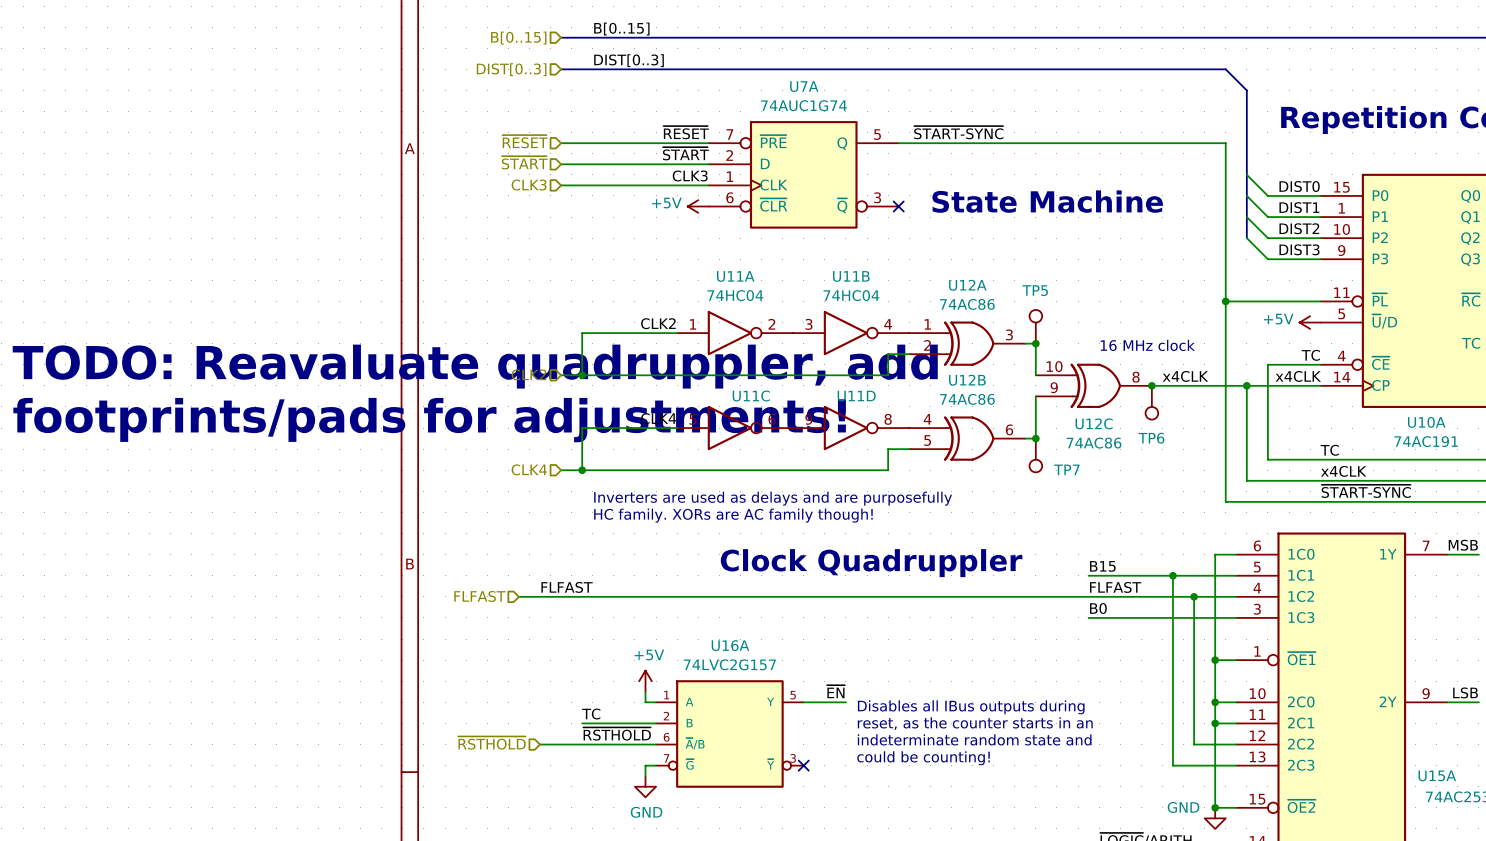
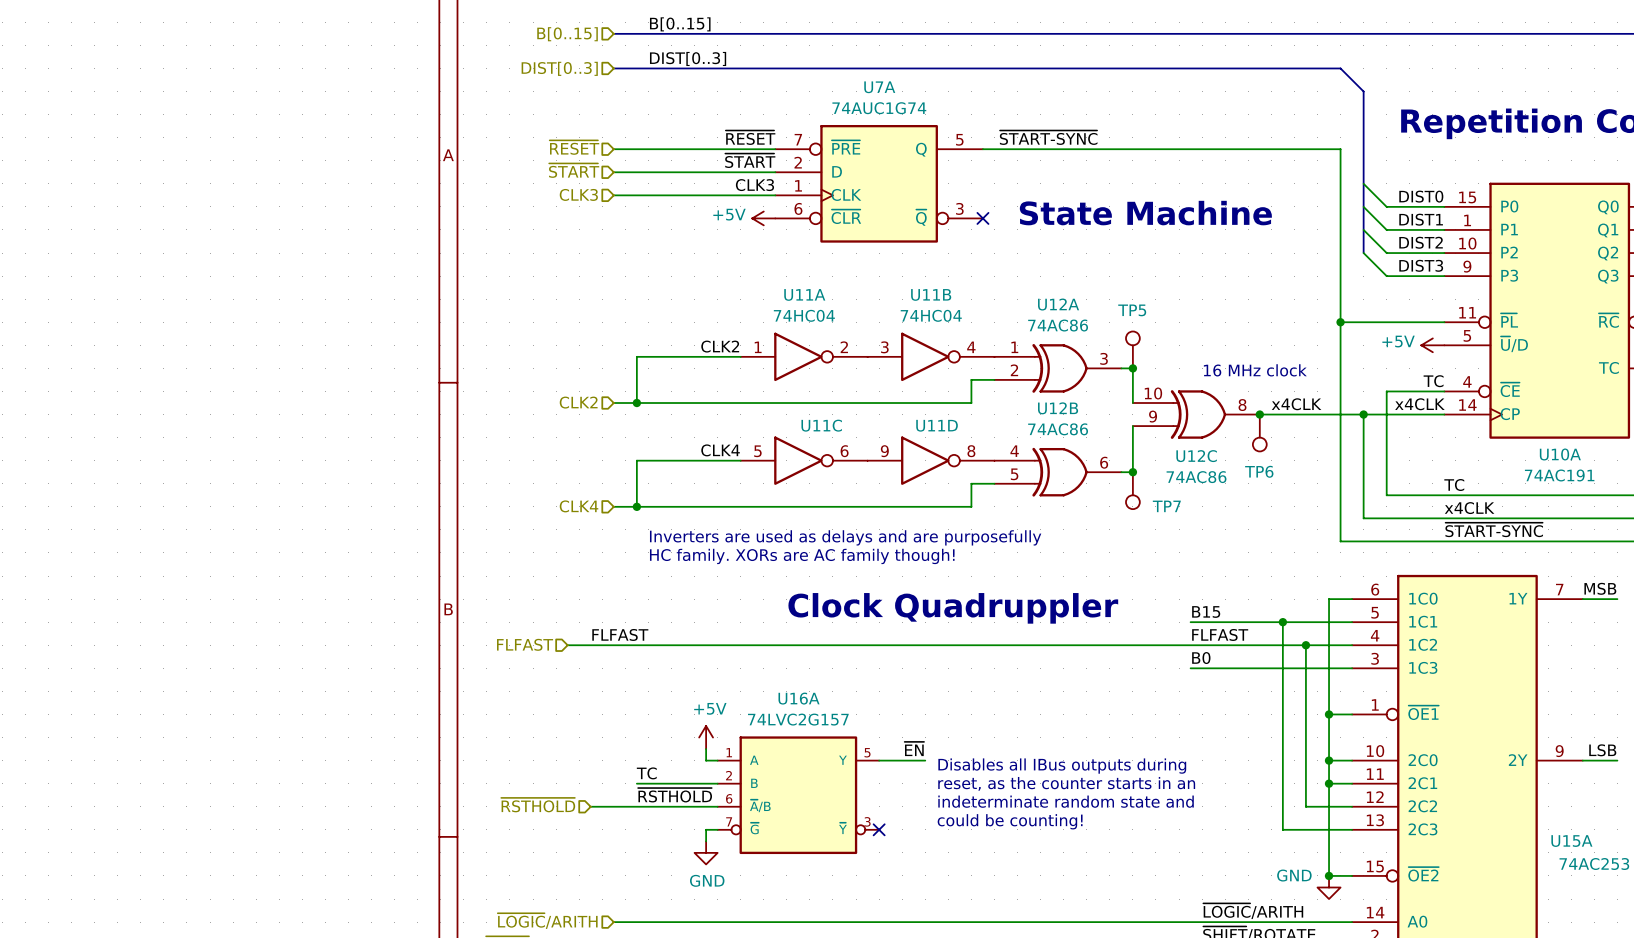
text: TODO: Reavaluate quadruppler, add (475, 366) -> none
text: footprints/pads for adjustments! (429, 420) -> none

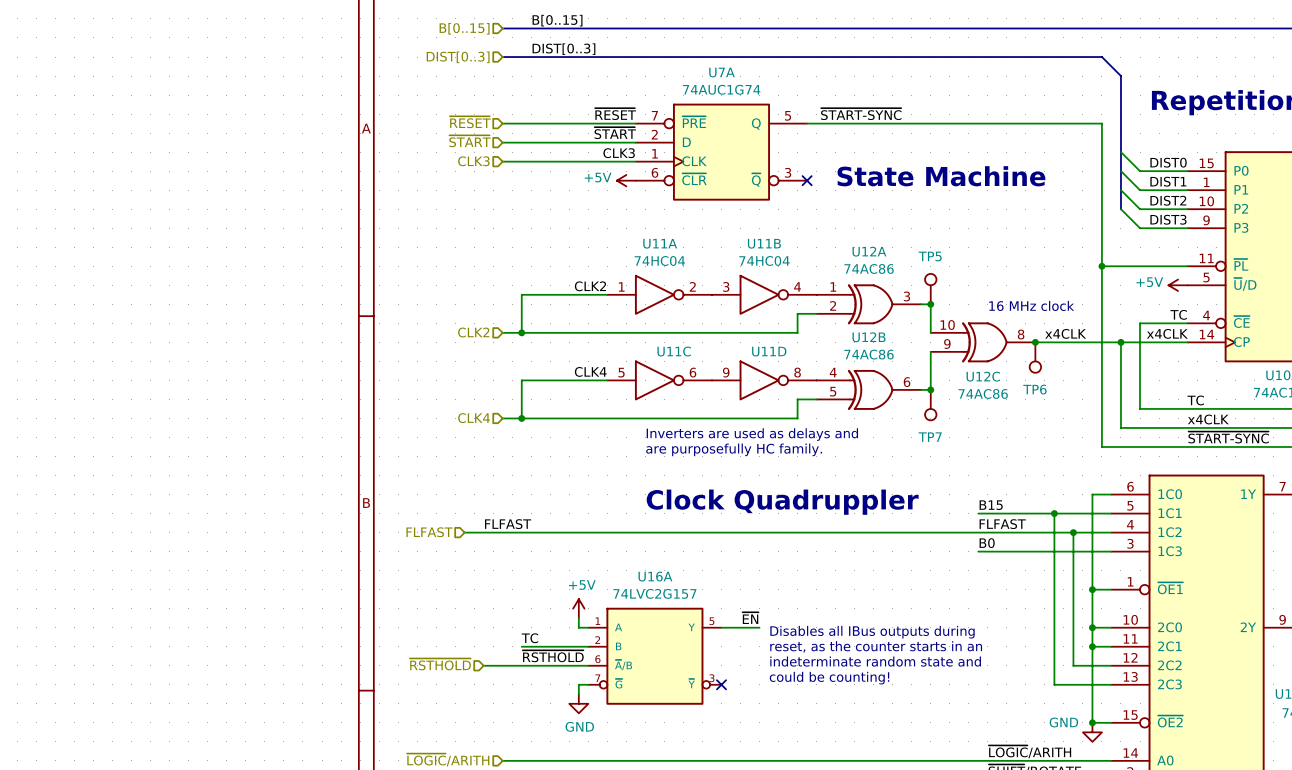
TP7 name position: TP7 (1166, 506) -> TP7 (930, 437)
text: Inverters are used as delays and are purposefully (845, 537) -> Inverters are used as delays and (752, 434)
text: none -> are purposefully HC family. (734, 449)
text: HC family. XORs are AC family though! (802, 556) -> none

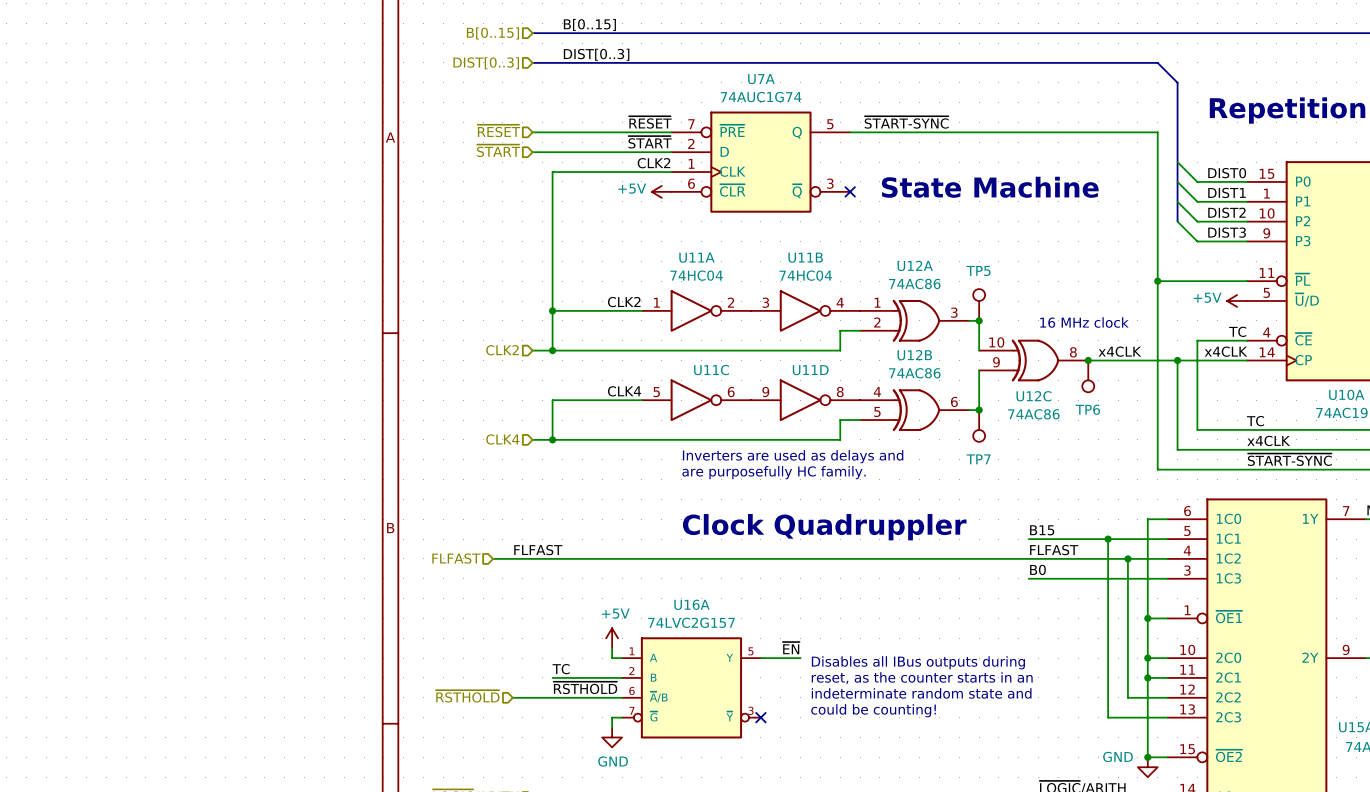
label: CLK3 (619, 153) -> CLK2 (654, 163)
hierarchical label: CLK3 (473, 161) -> none
wire: (502, 161) (521, 161) -> (552, 310) (552, 172)
junction: none -> (552, 310)

